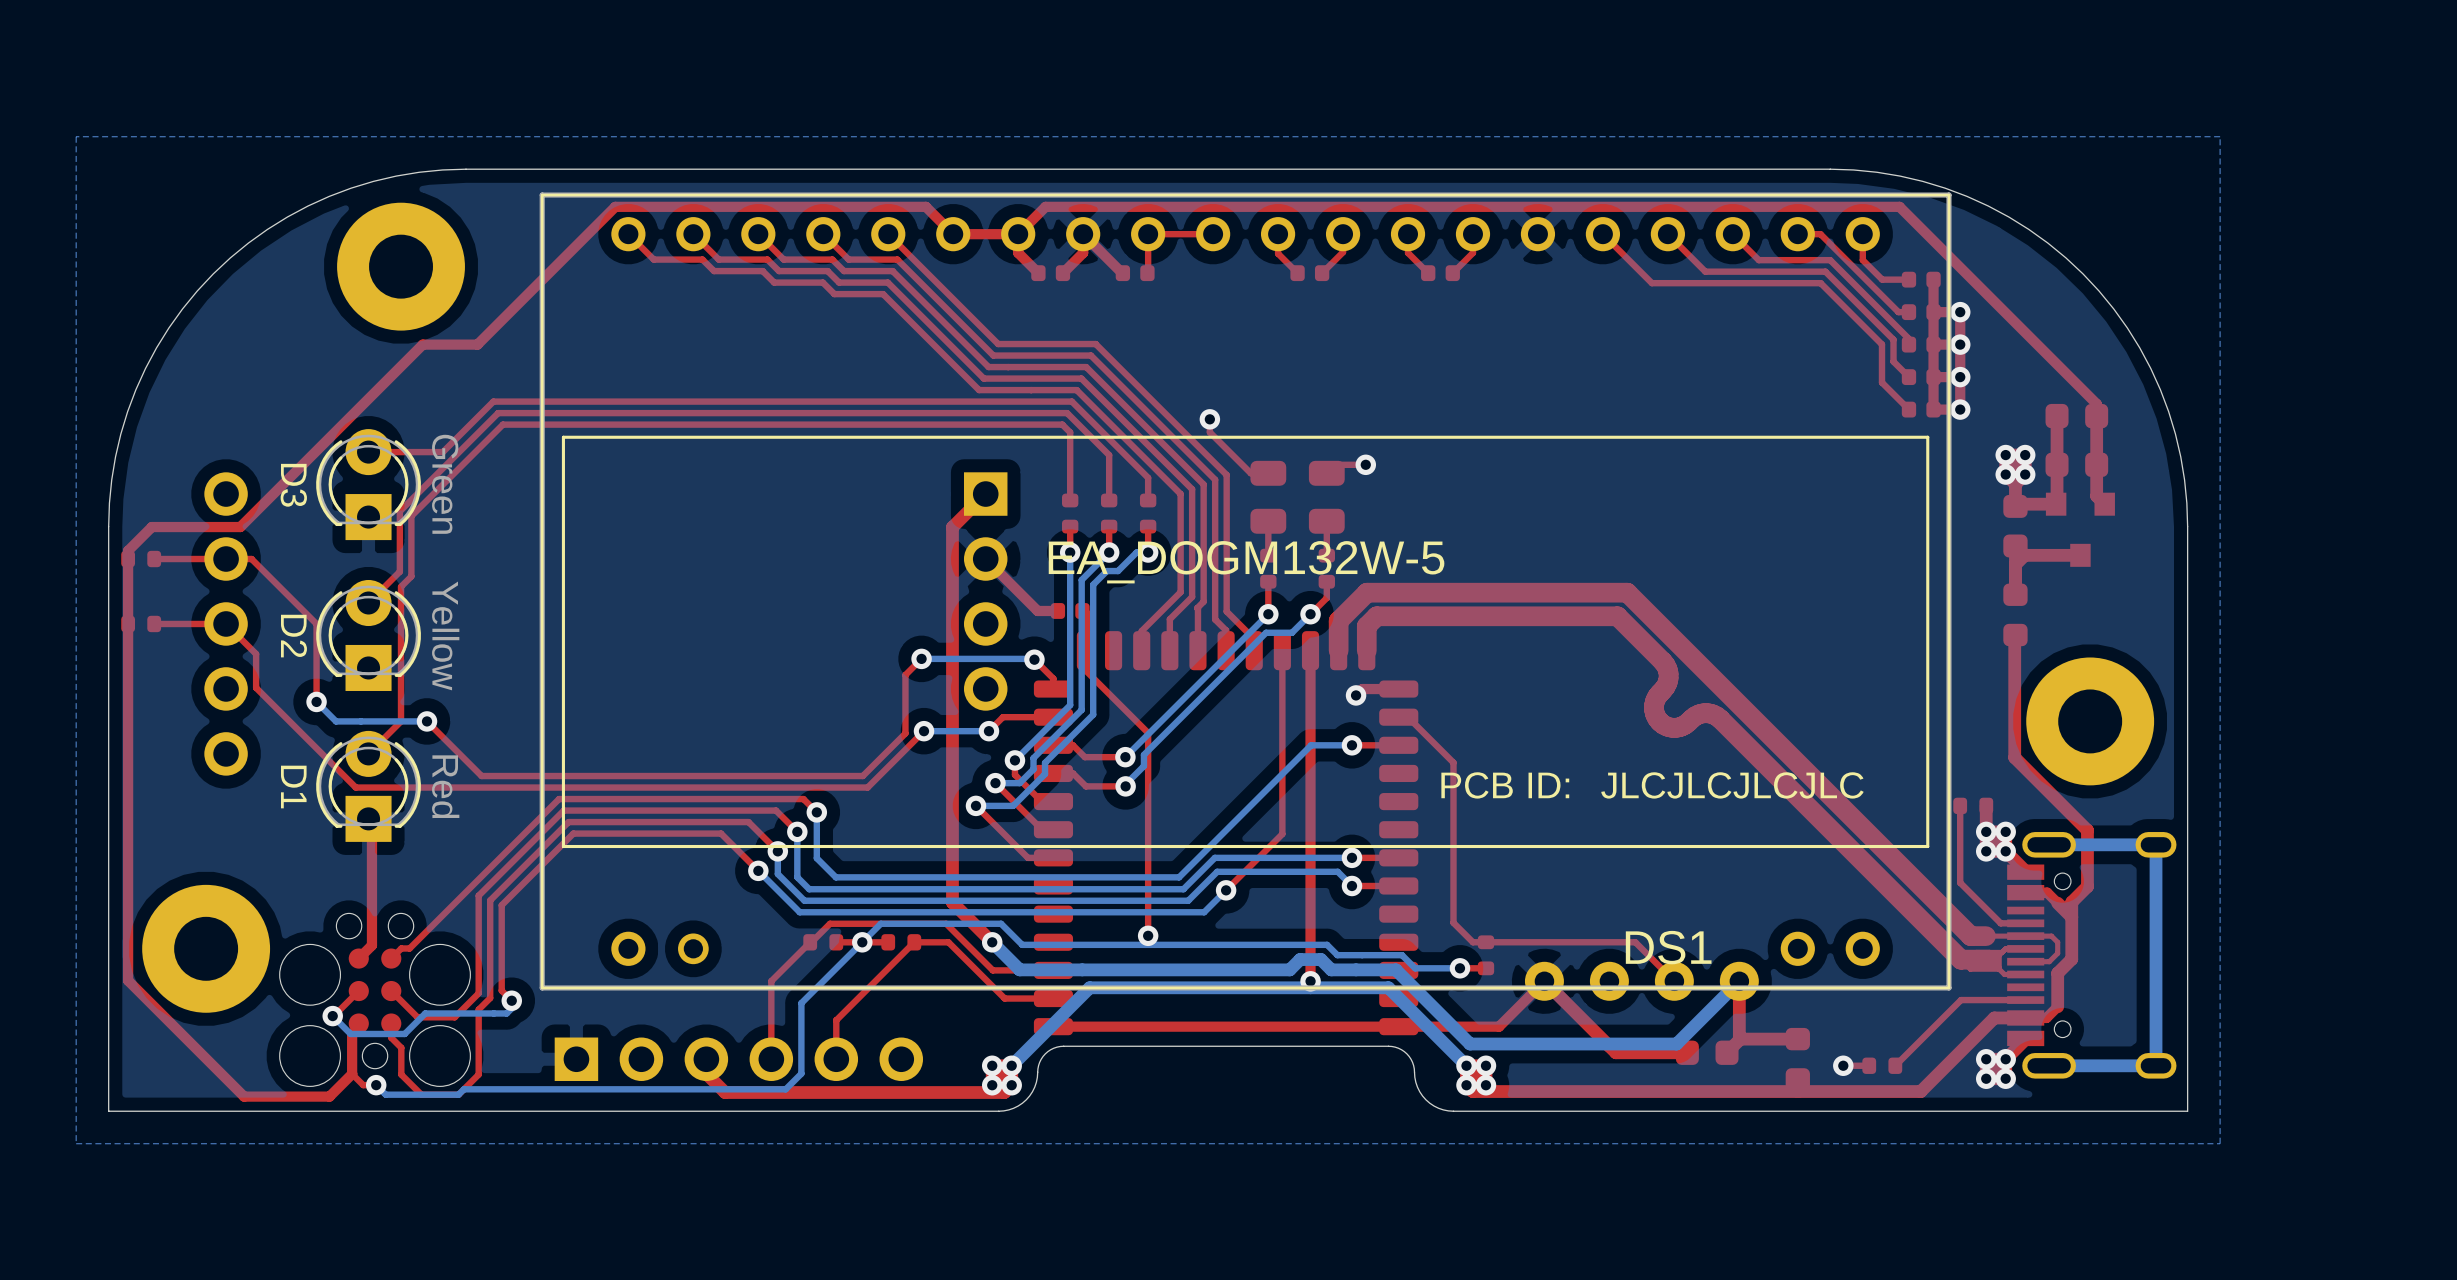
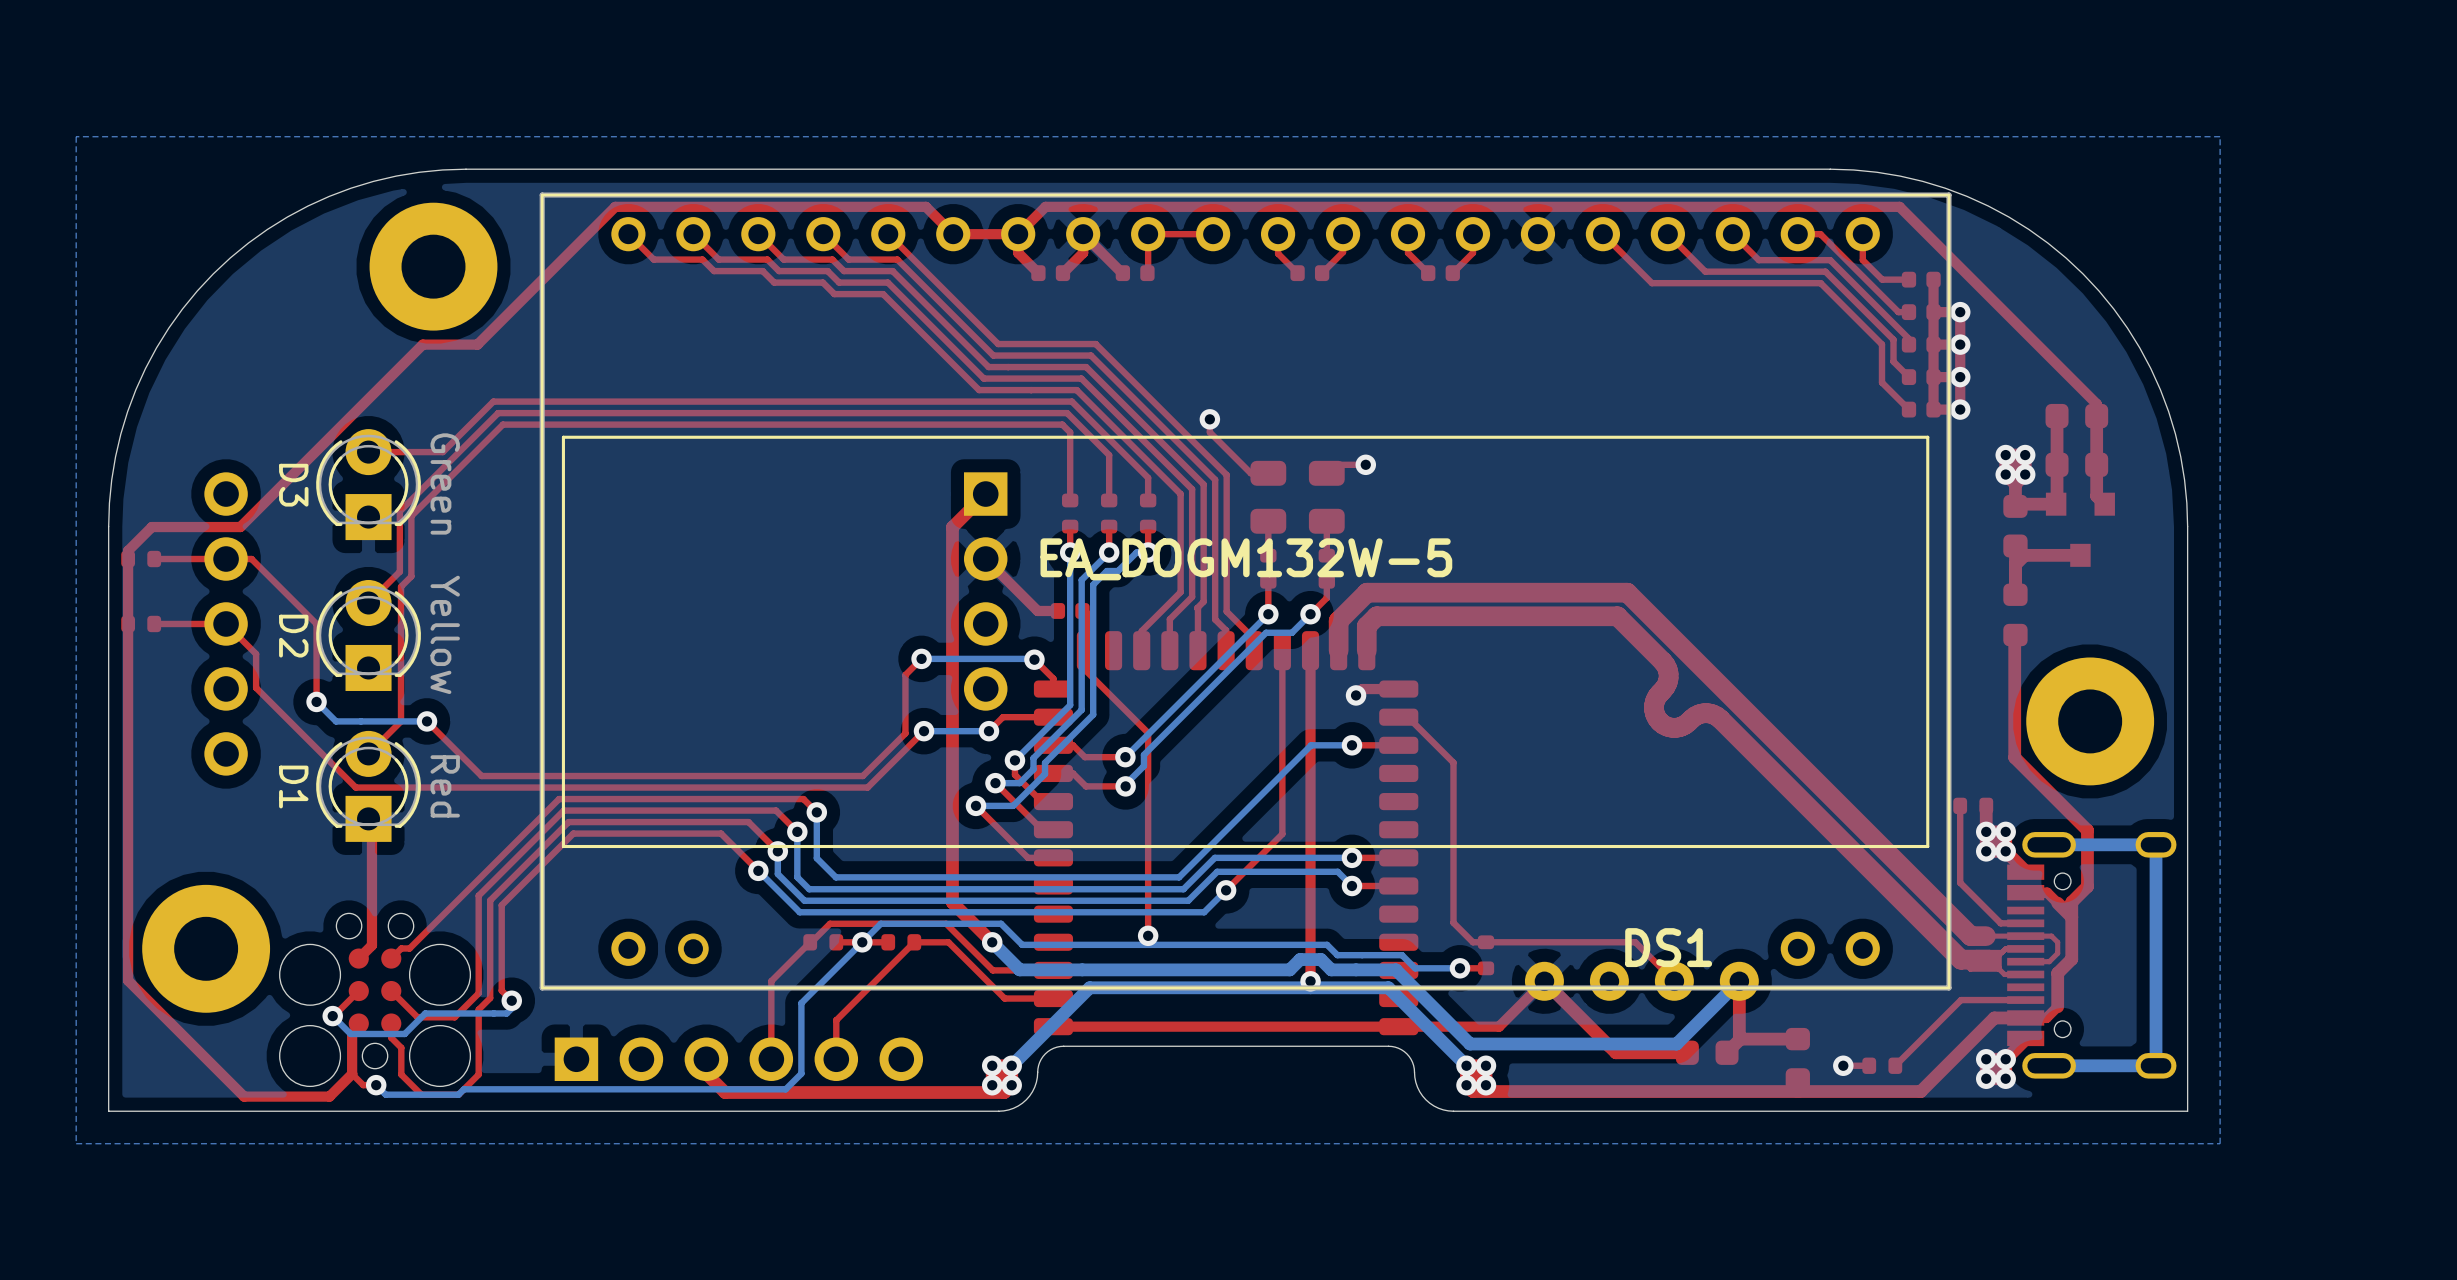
part position: (401, 266) -> (433, 266)
text: PCB ID: (1505, 785) -> none
text: JLCJLCJLCJLC (1732, 785) -> none

